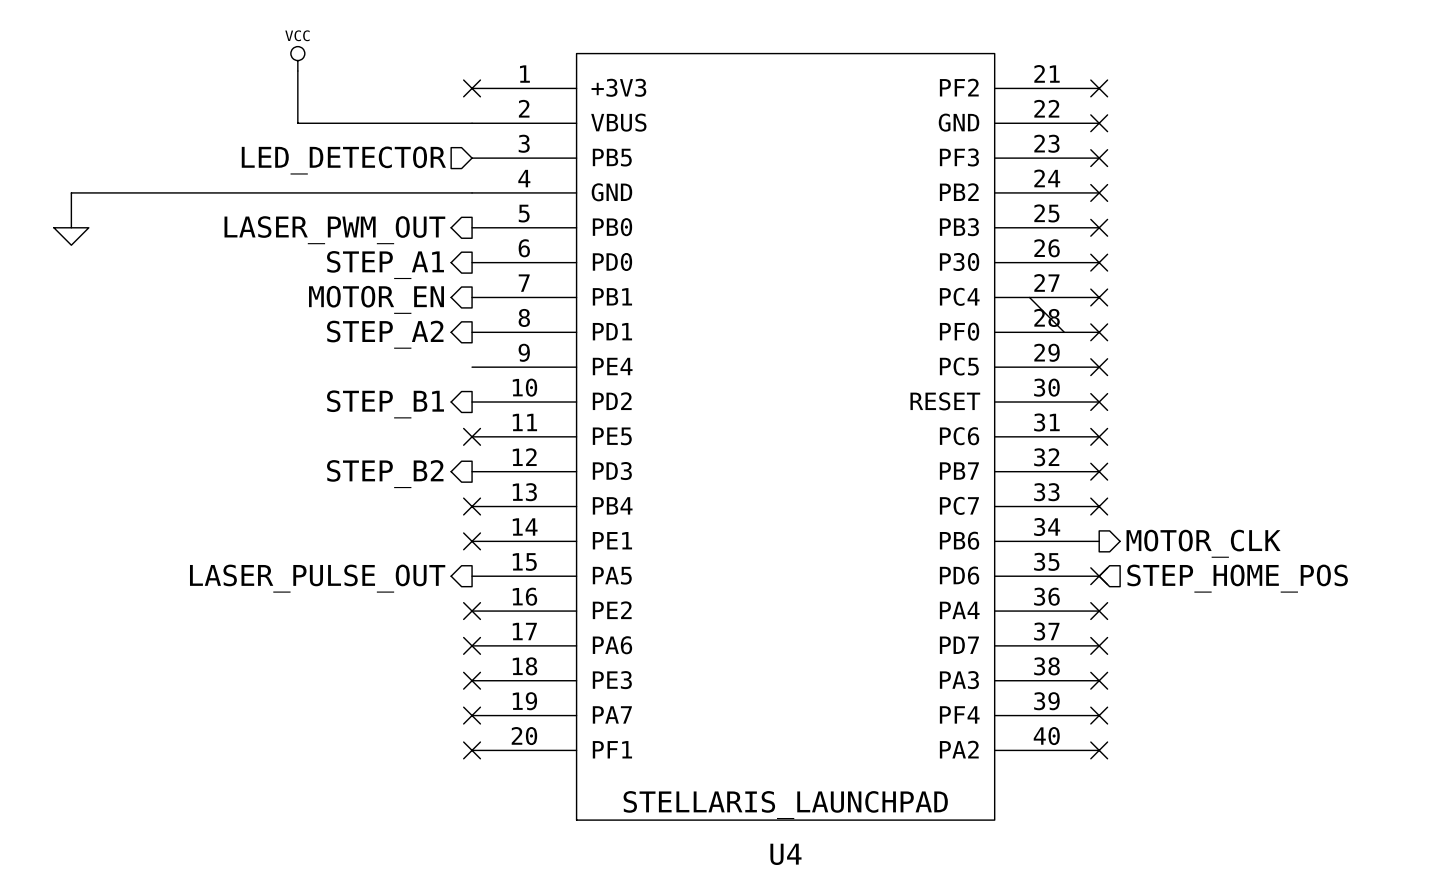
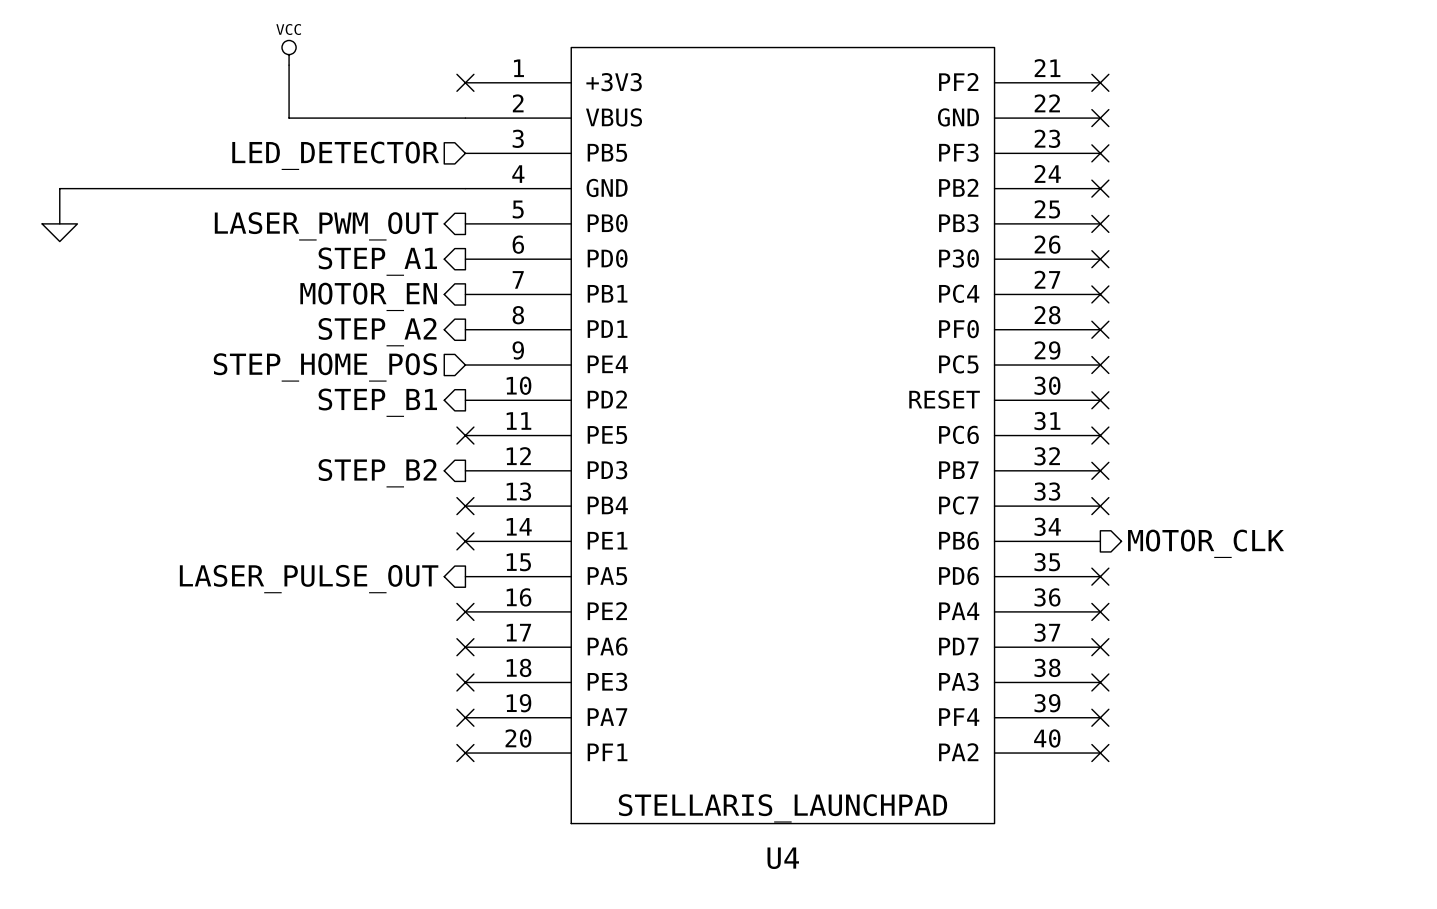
wire: (1029, 297) (1064, 332) -> none
hierarchical label: none -> STEP_HOME_POS (325, 367)
hierarchical label: STEP_HOME_POS (1237, 578) -> none

